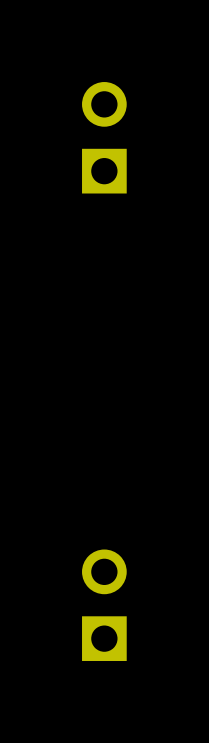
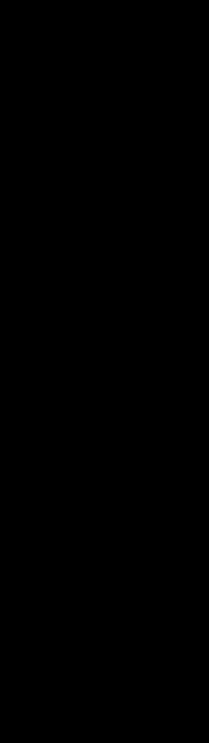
part: (104, 137) -> none
part: (104, 605) -> none

